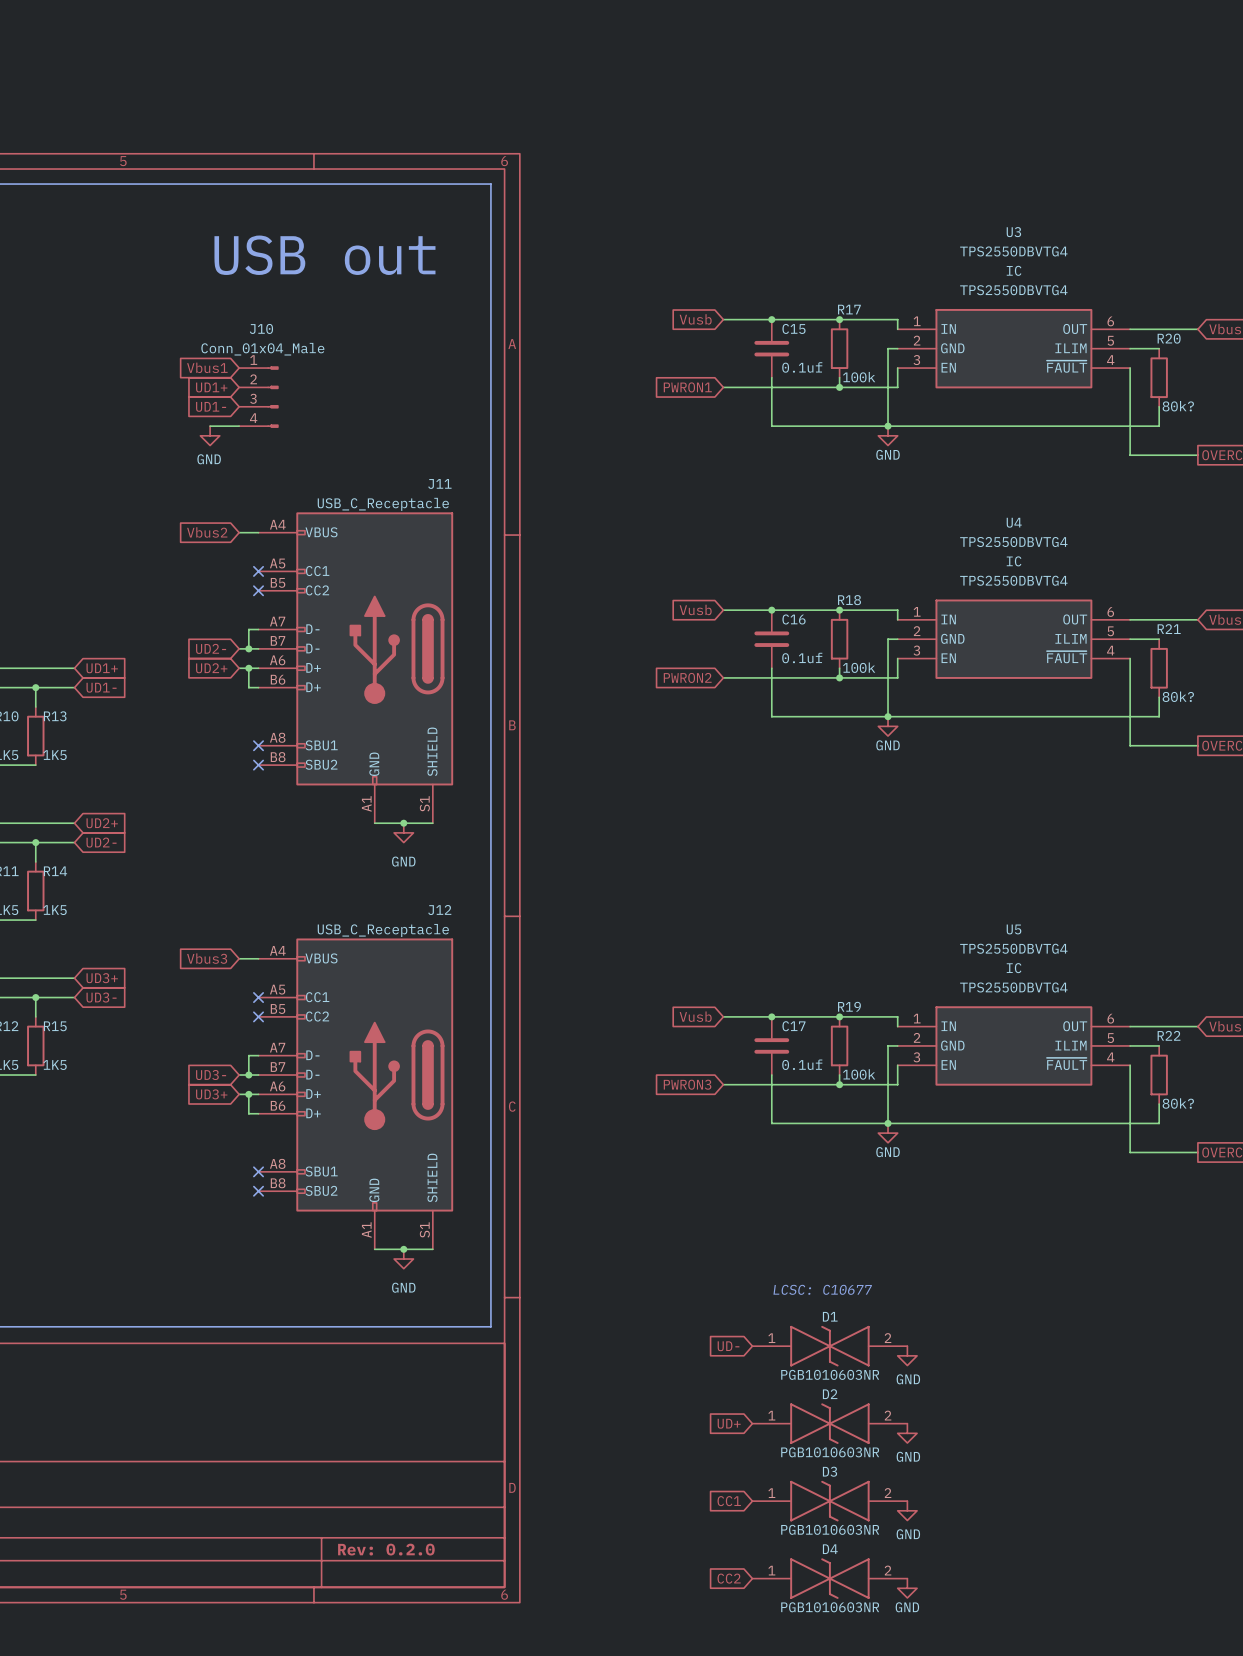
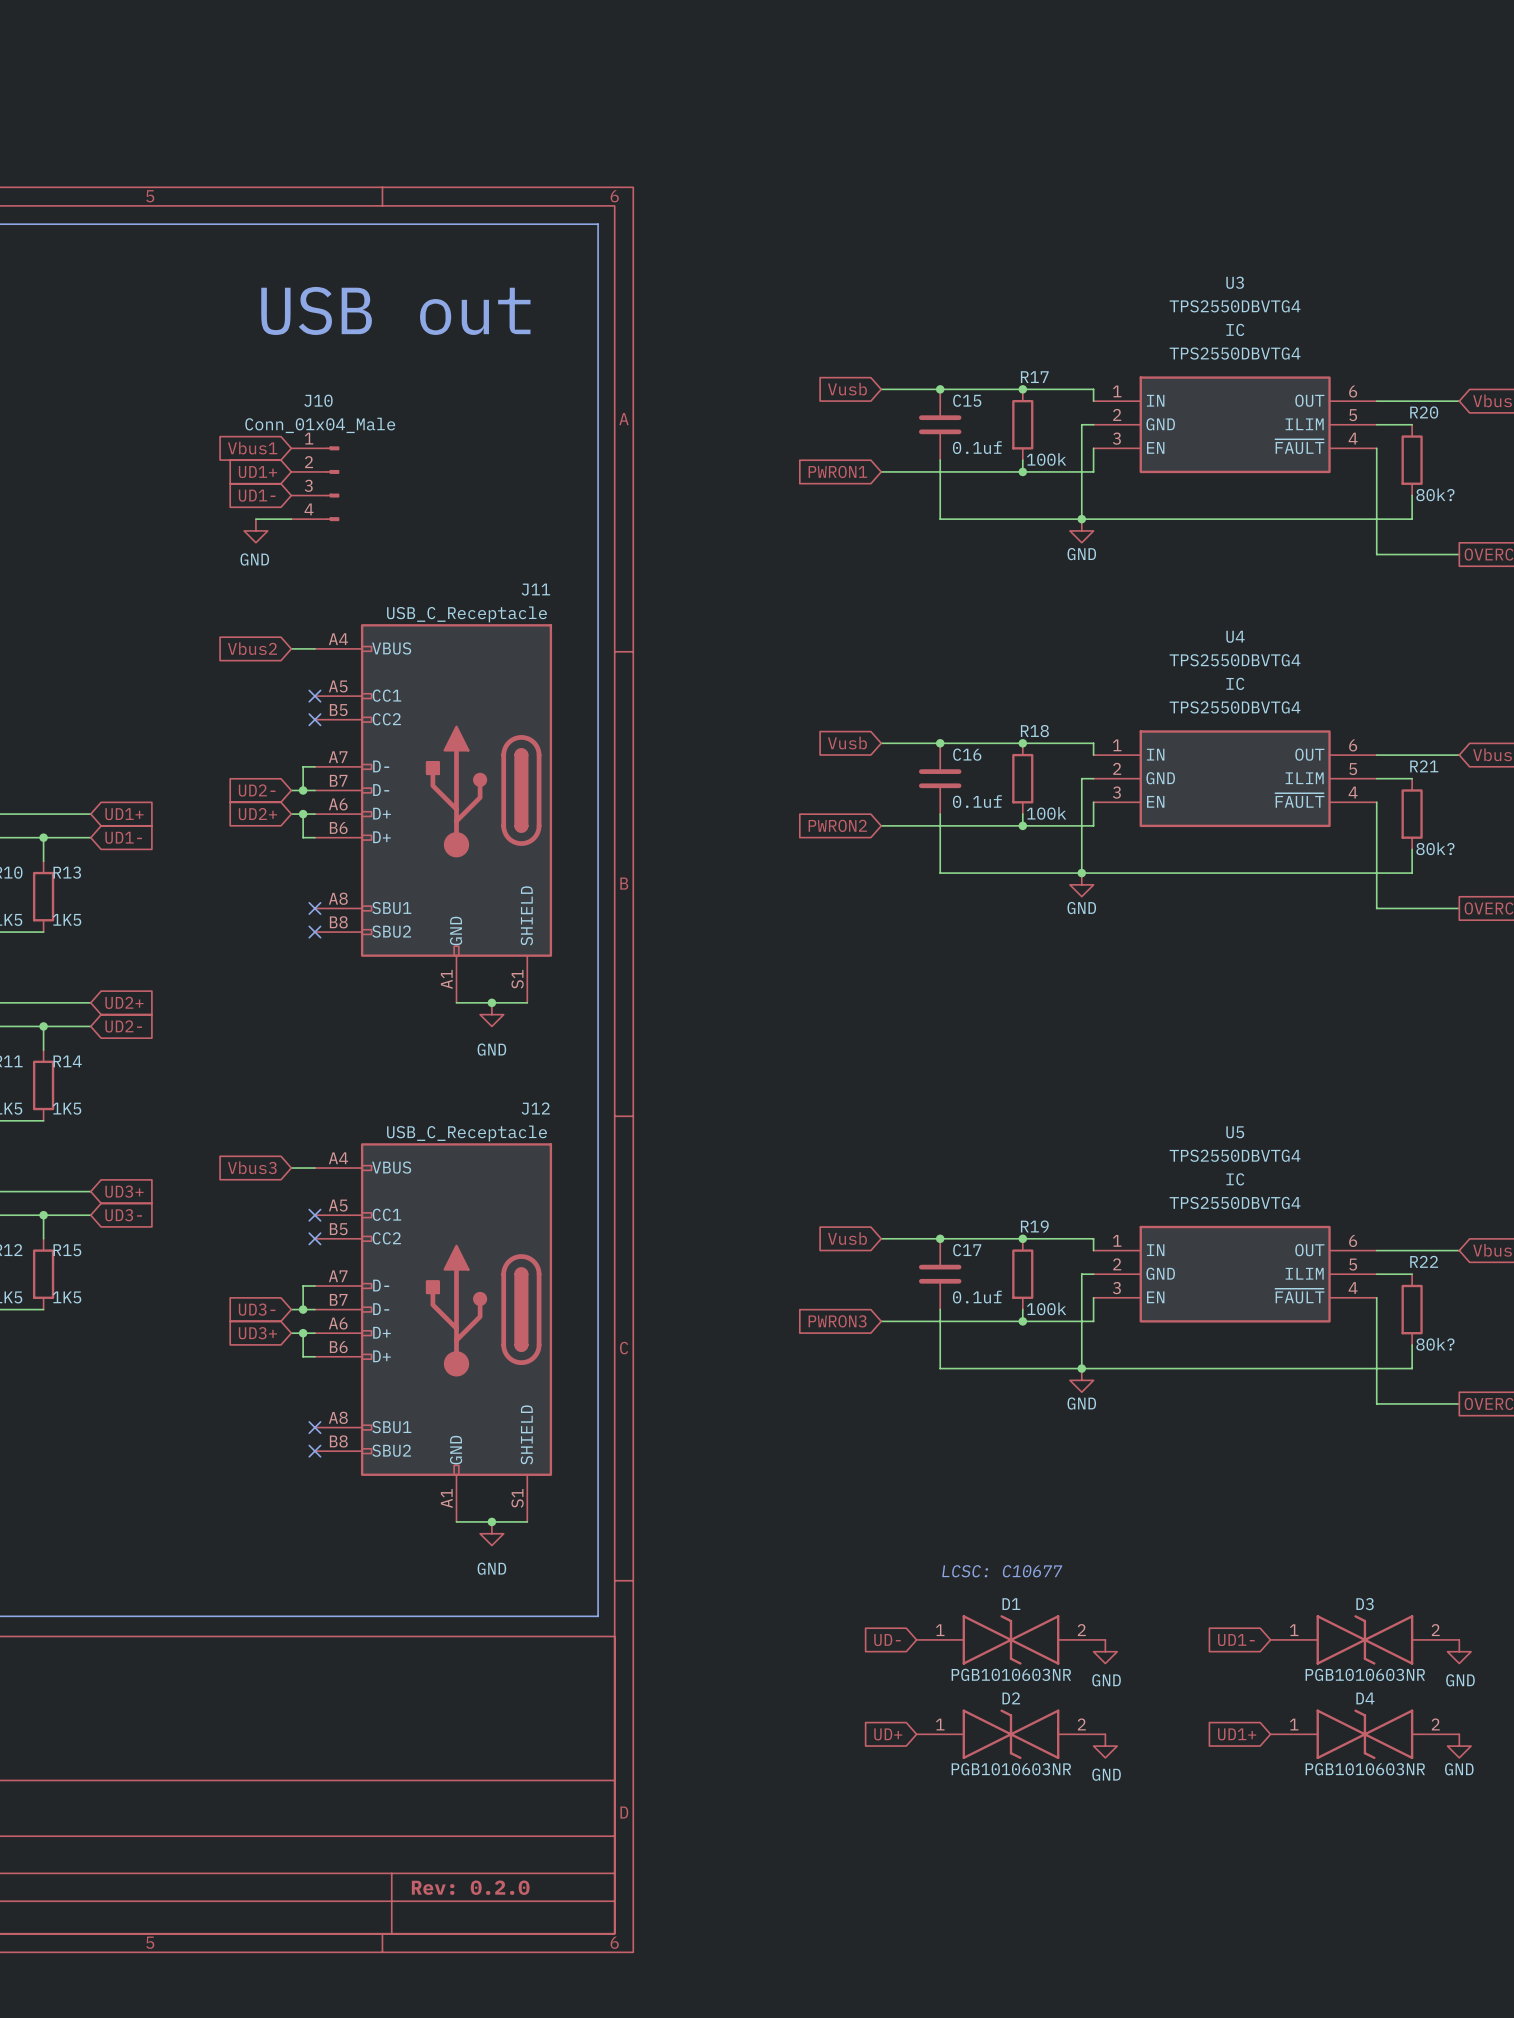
global label: none -> UD1- (1236, 1640)
power symbol: none -> GND (1459, 1651)
global label: none -> UD1+ (1237, 1734)
power symbol: none -> GND (1459, 1746)
global label: CC1 (729, 1501) -> none
D3 position: (829, 1501) -> (1364, 1639)
power symbol: GND (907, 1510) -> none
global label: CC2 (729, 1578) -> none
D4 position: (829, 1578) -> (1364, 1734)
power symbol: GND (907, 1588) -> none

